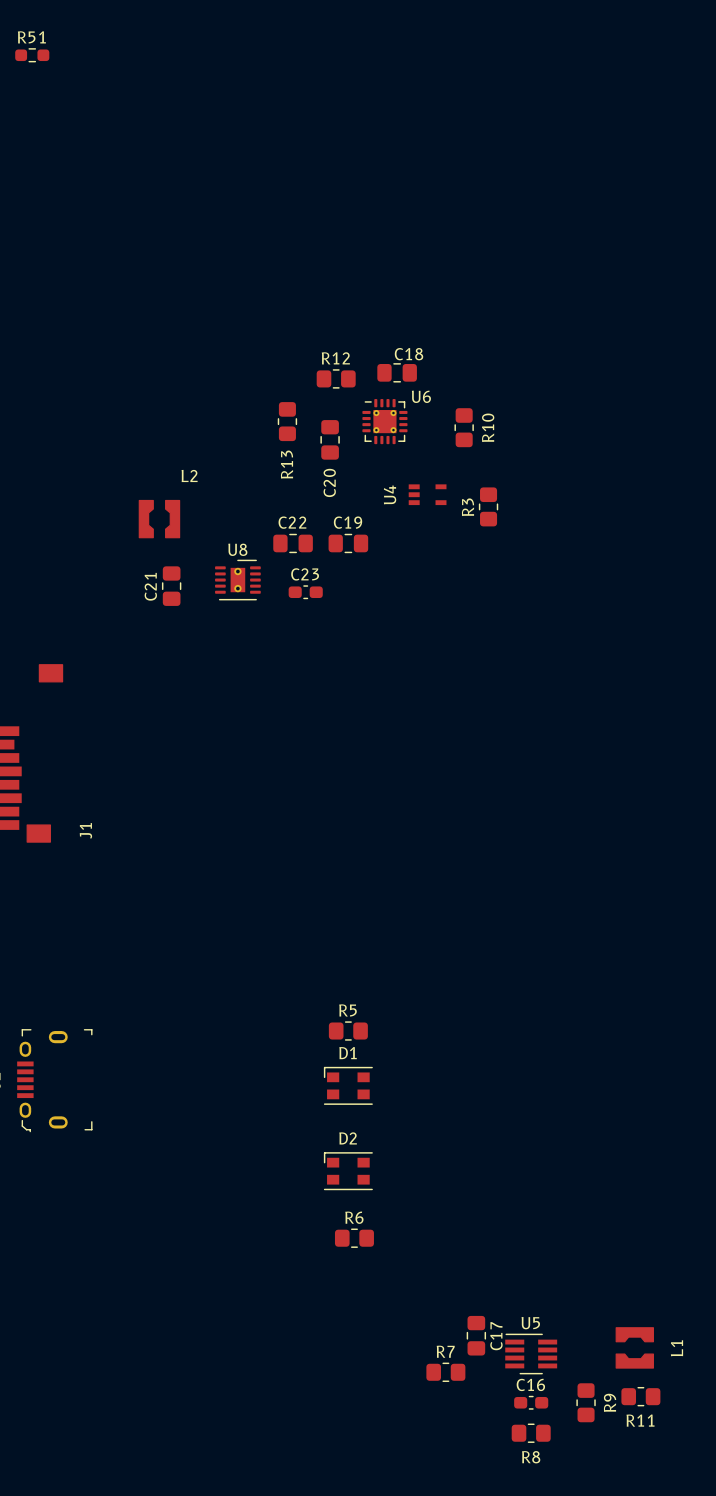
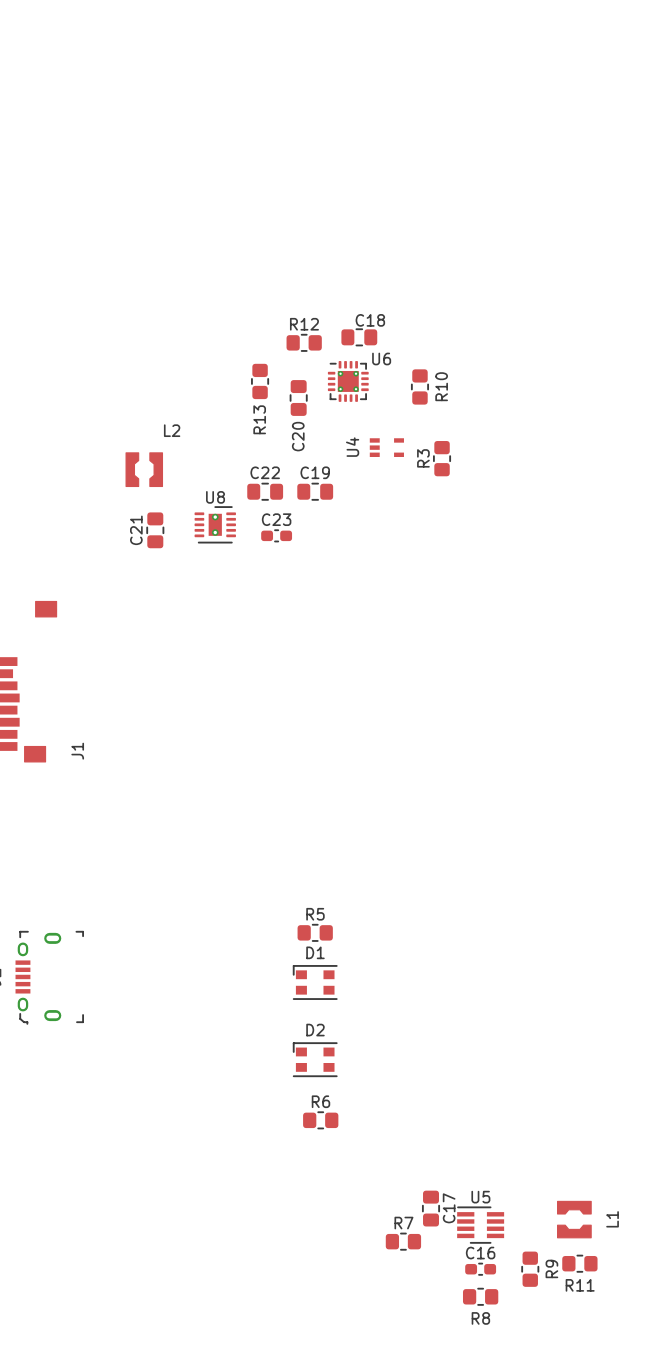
R51: (32, 55) -> none

